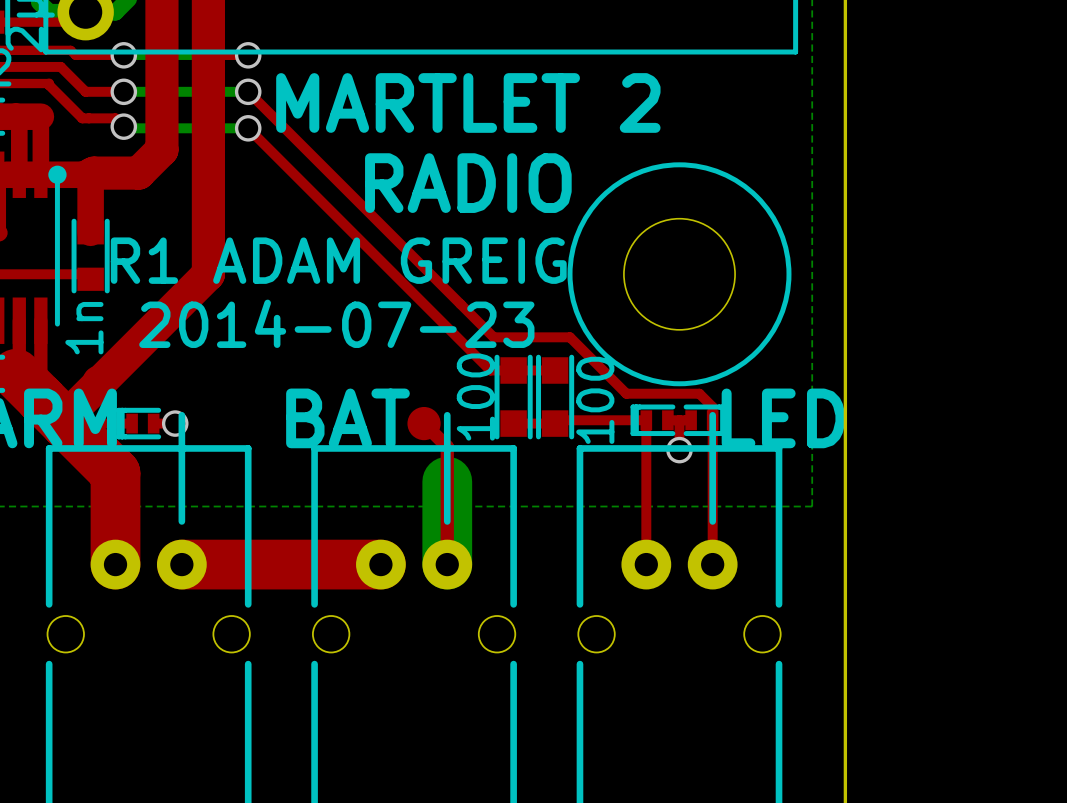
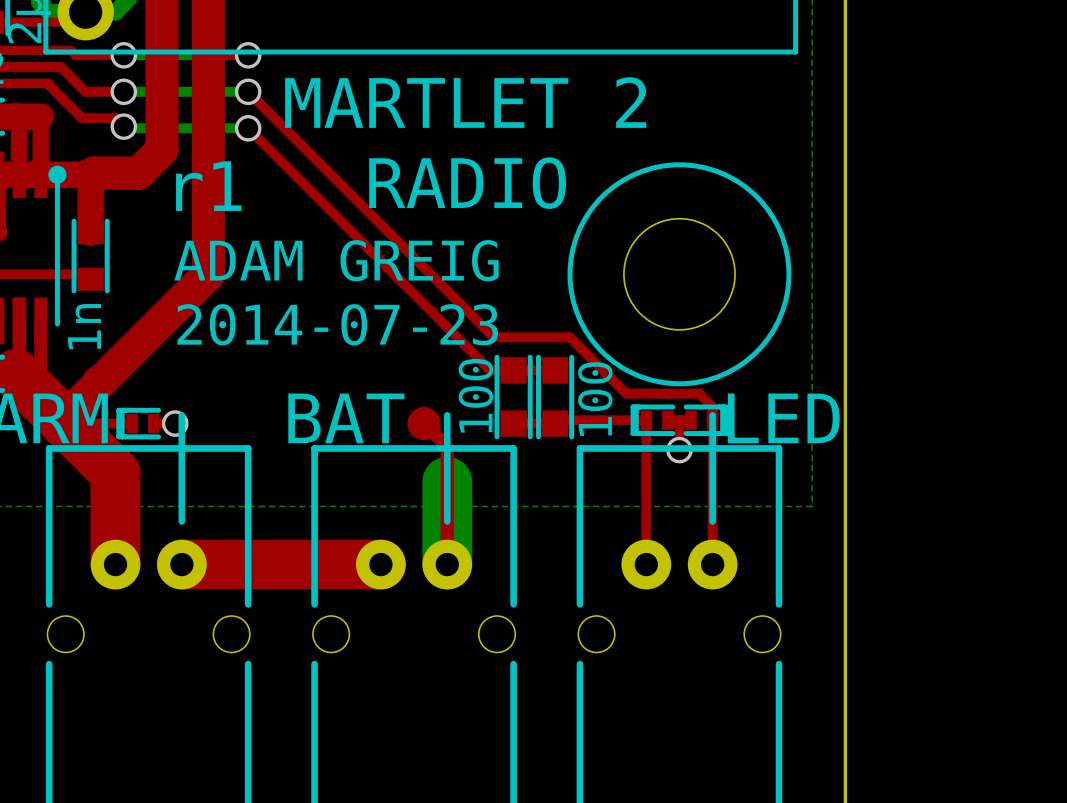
text: none -> r1 (208, 186)
text: R1 ADAM GREIG (338, 260) -> ADAM GREIG (336, 260)

